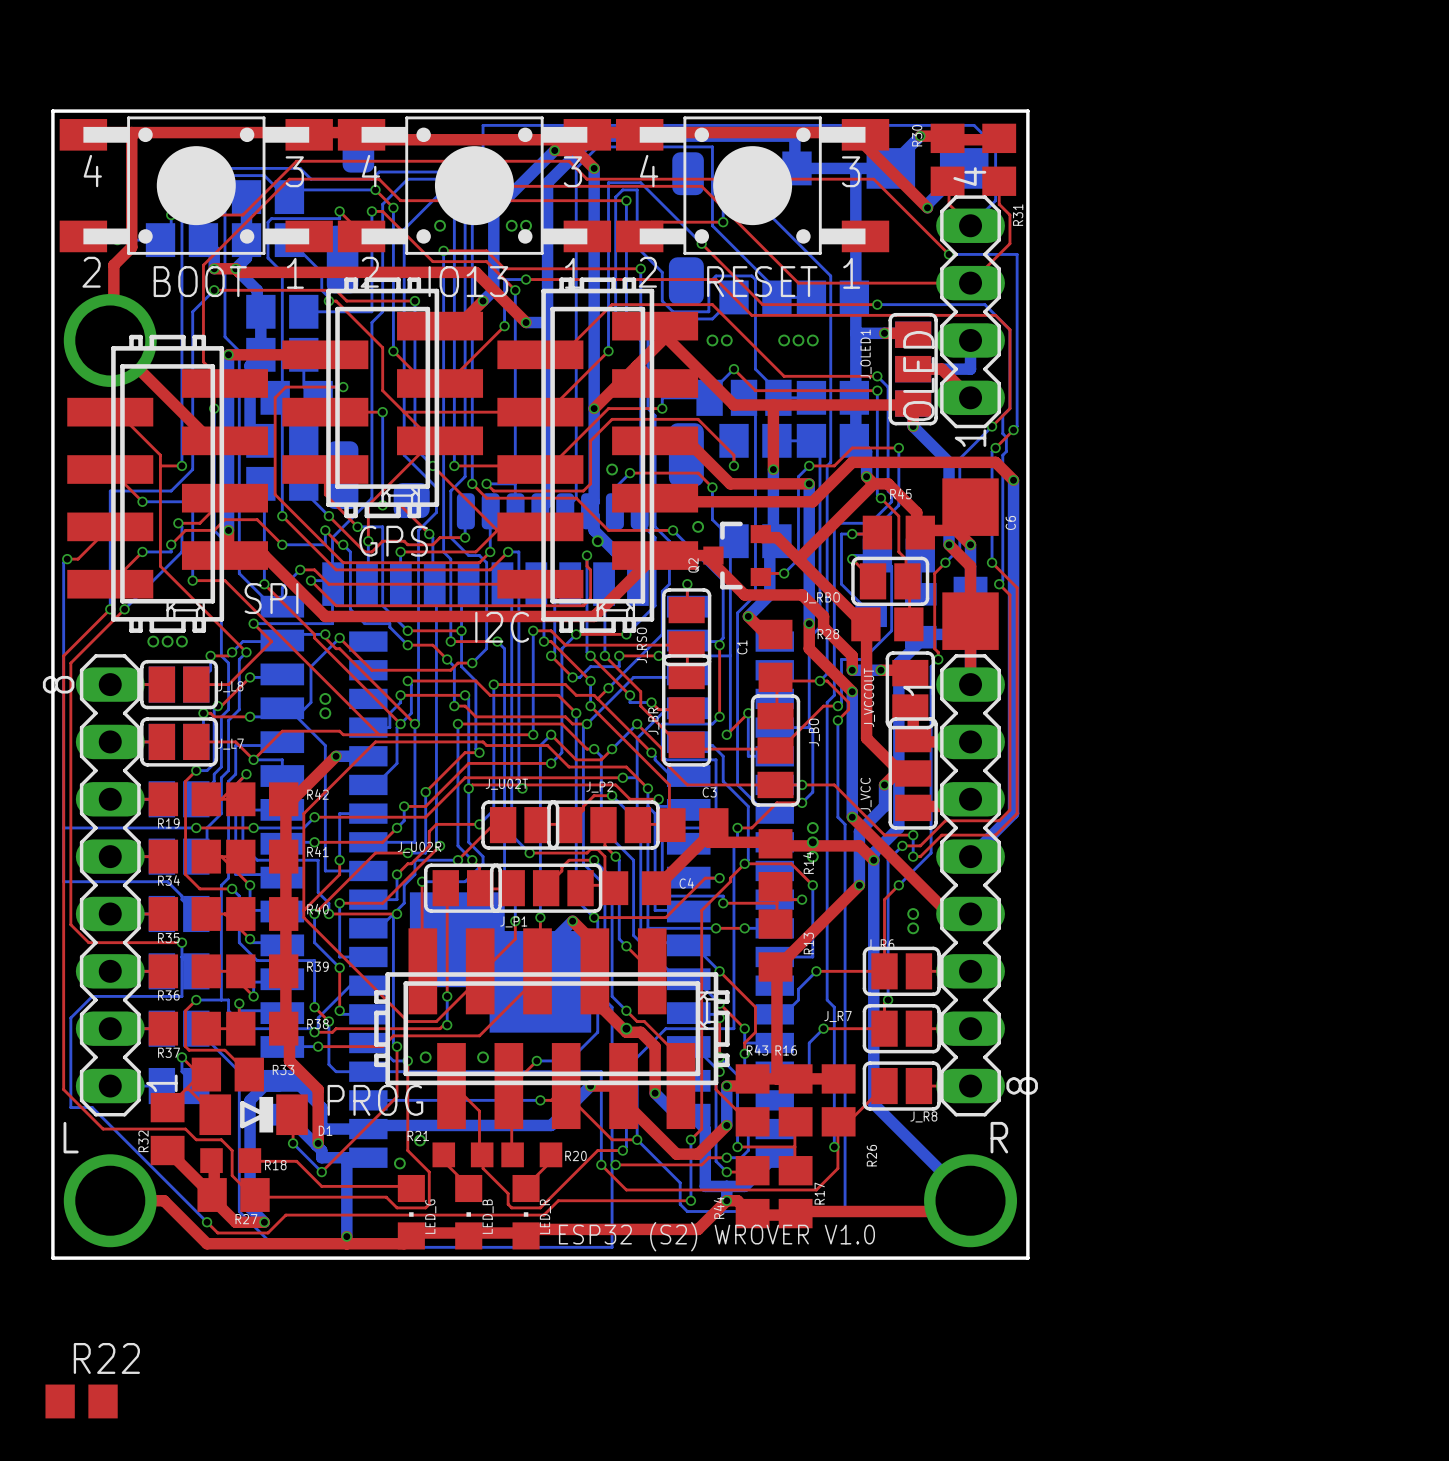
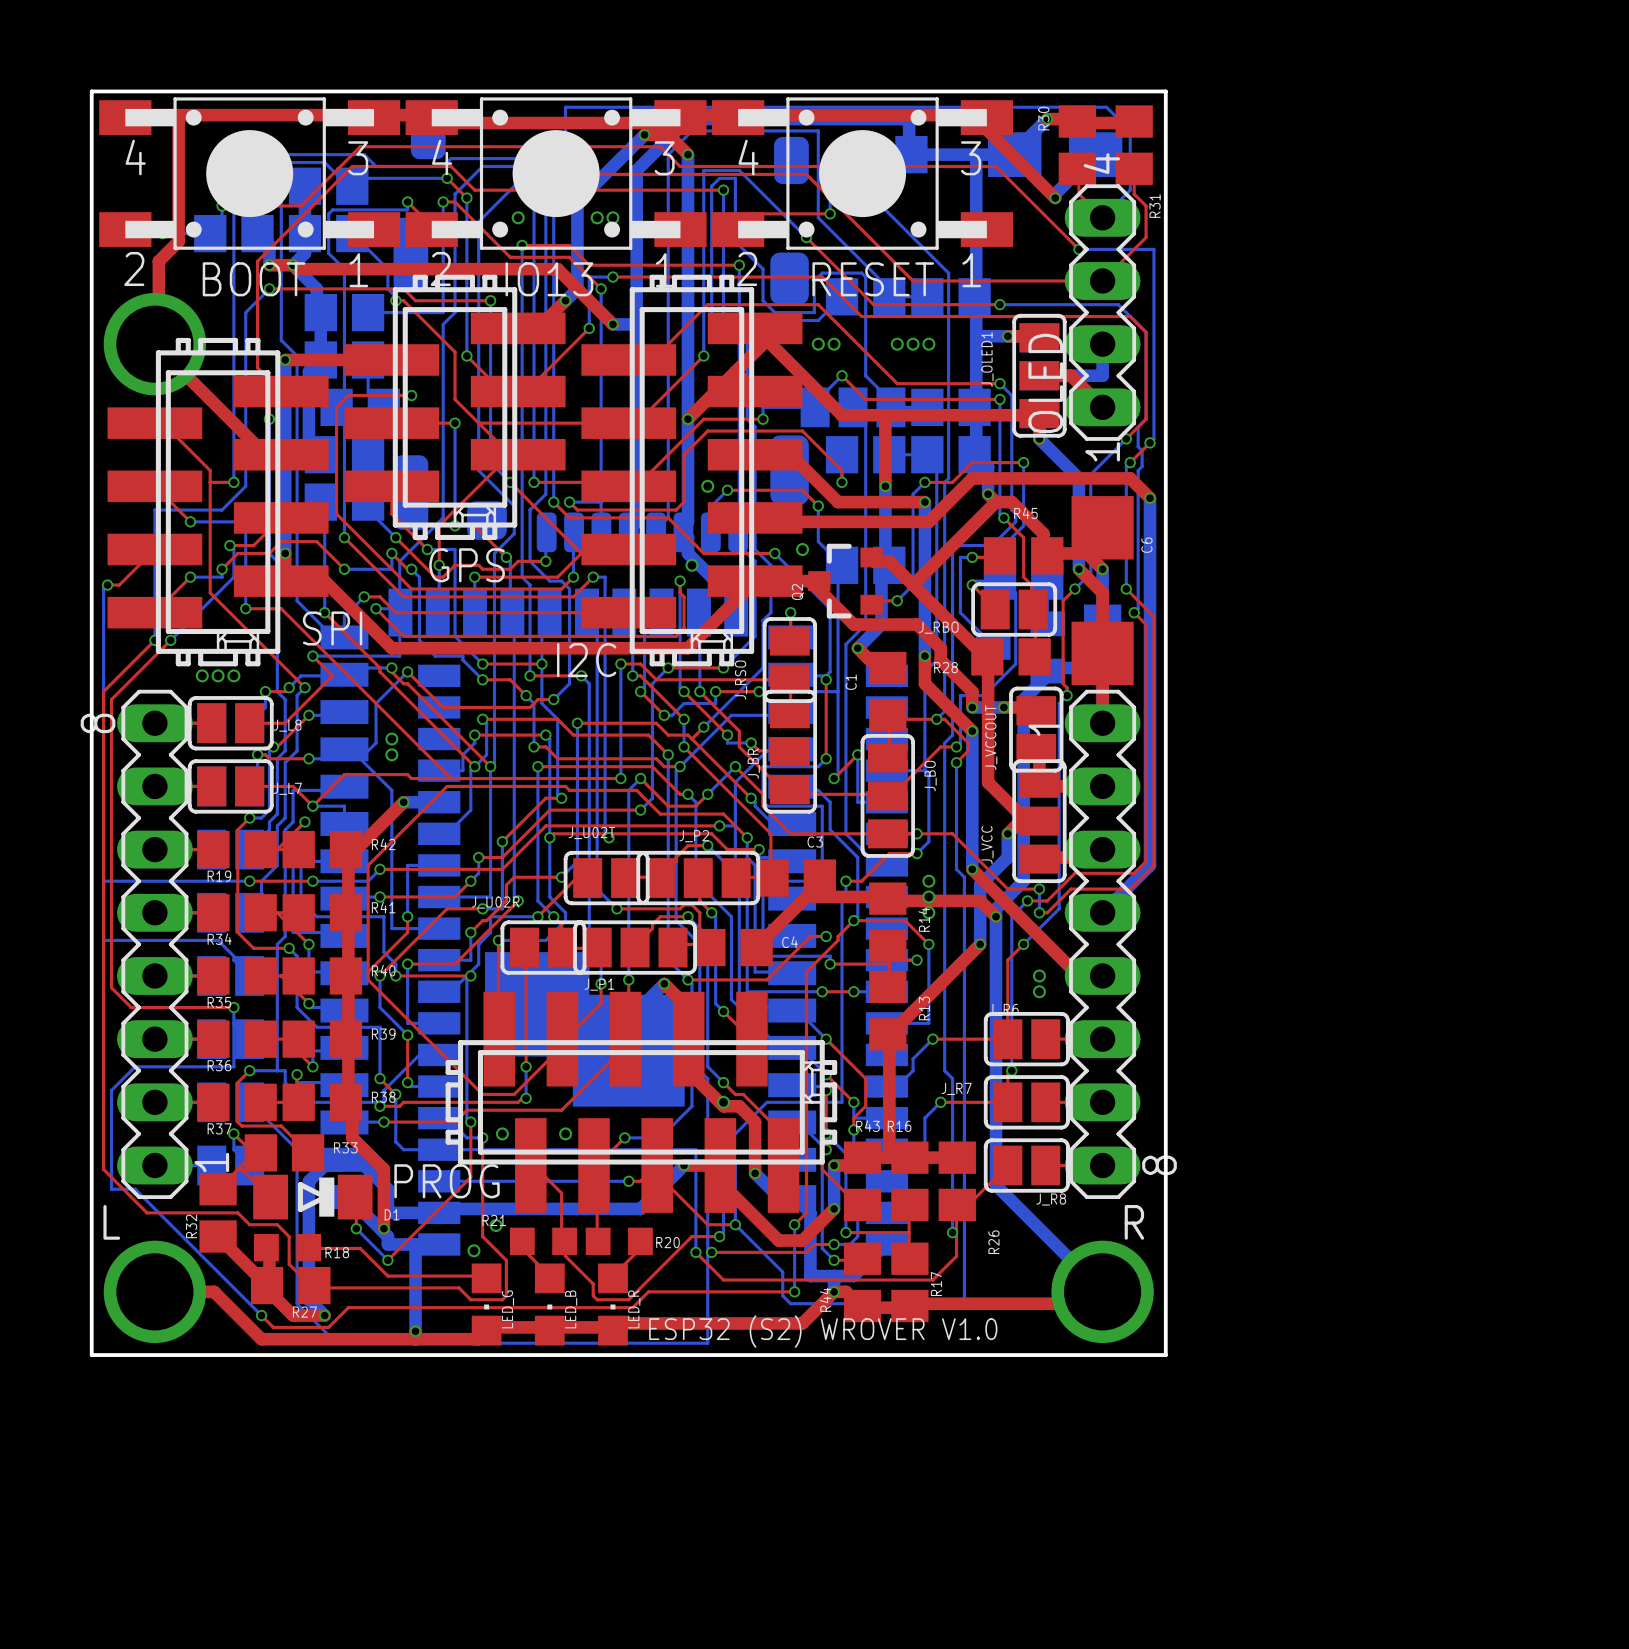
R22: (81, 1401) -> none

